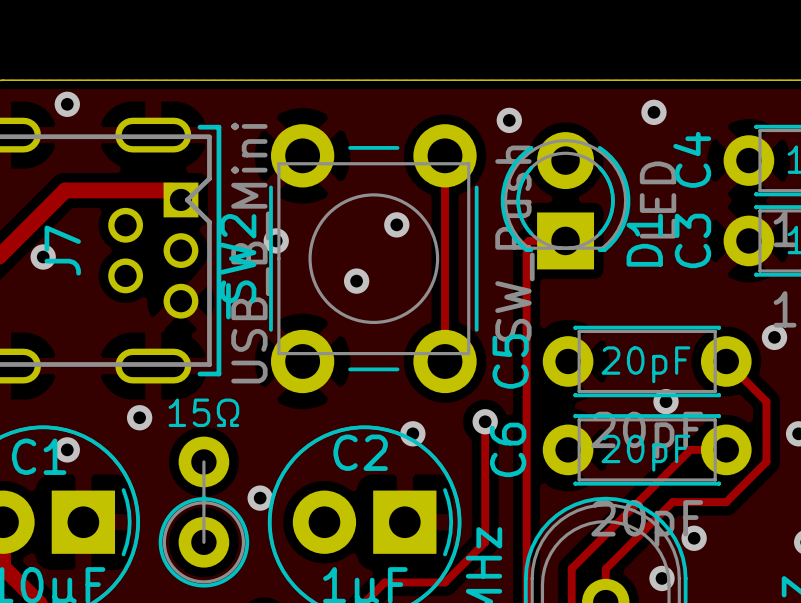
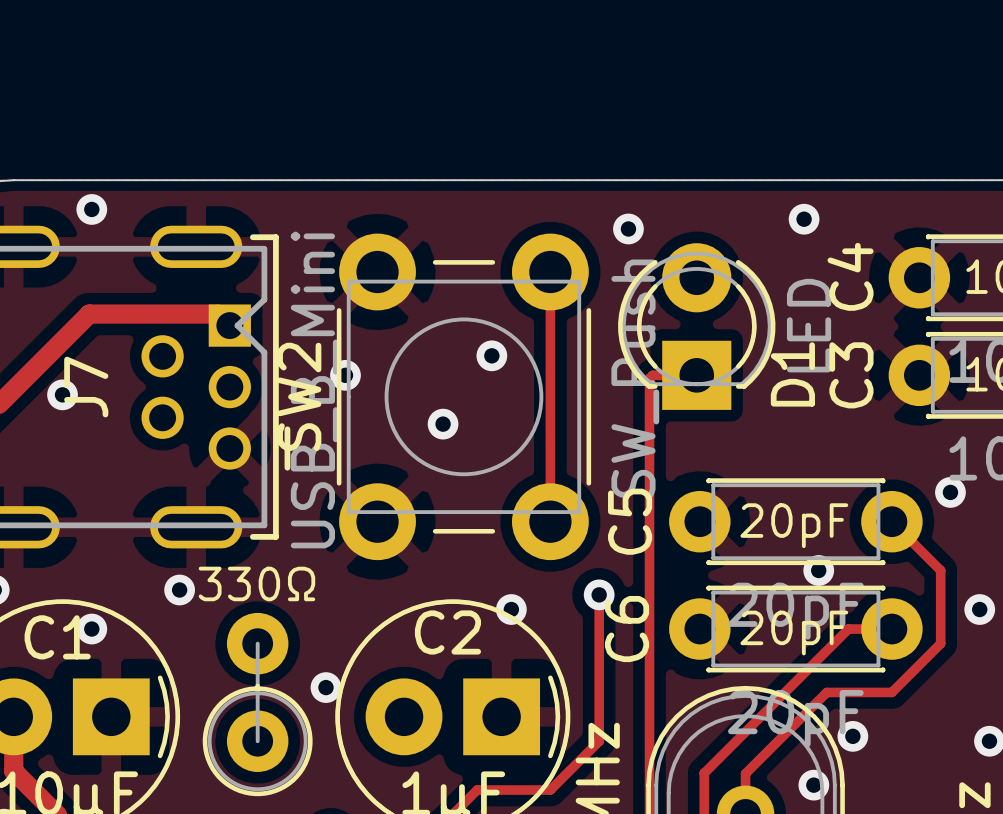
part value: 15Ω (203, 412) -> 330Ω (256, 583)

